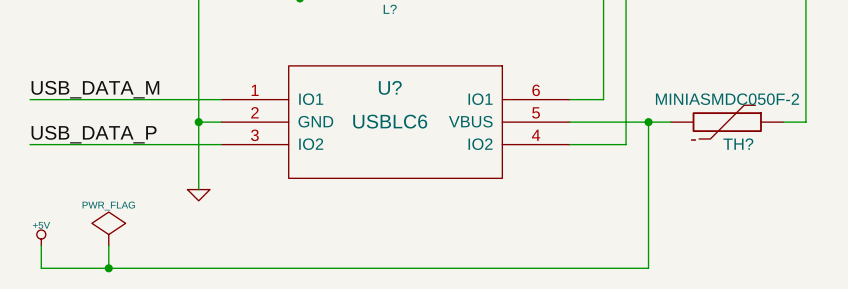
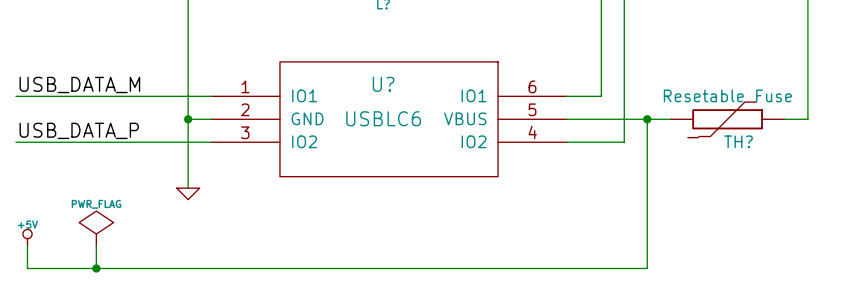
TH? value: MINIASMDC050F-2 (727, 99) -> Resetable Fuse (727, 95)

